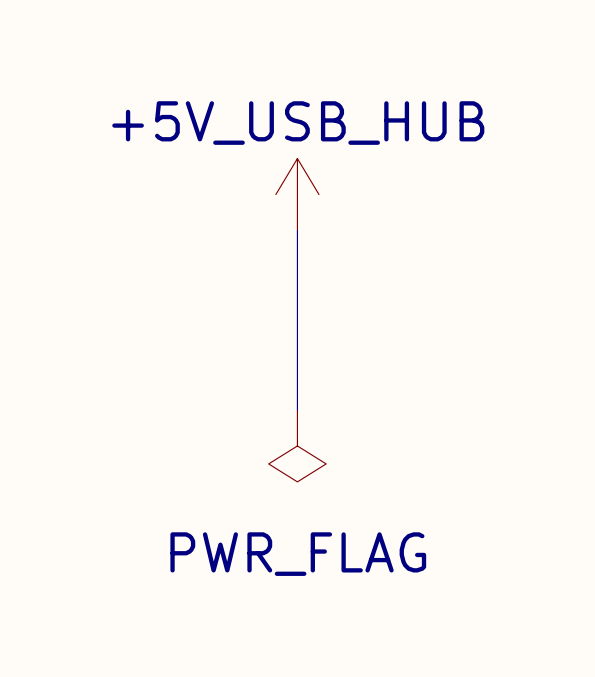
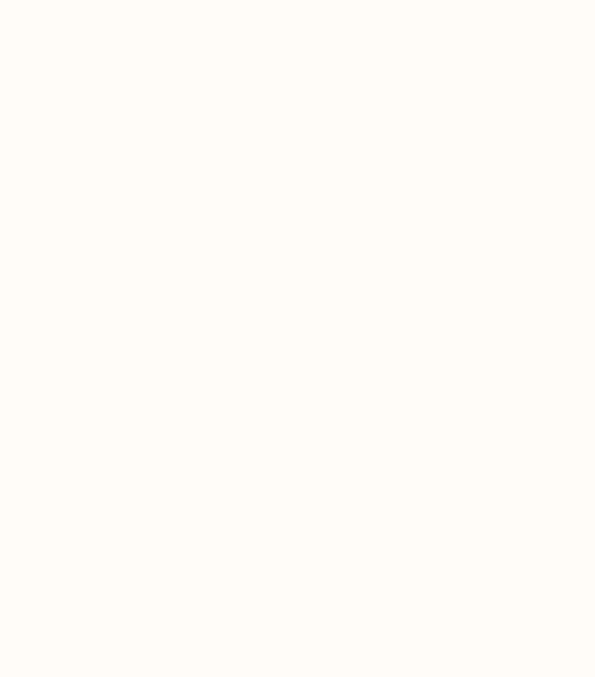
power symbol: +5V_USB_HUB (297, 194) -> none
wire: (297, 230) (297, 410) -> none
power symbol: PWR_FLAG (297, 445) -> none

